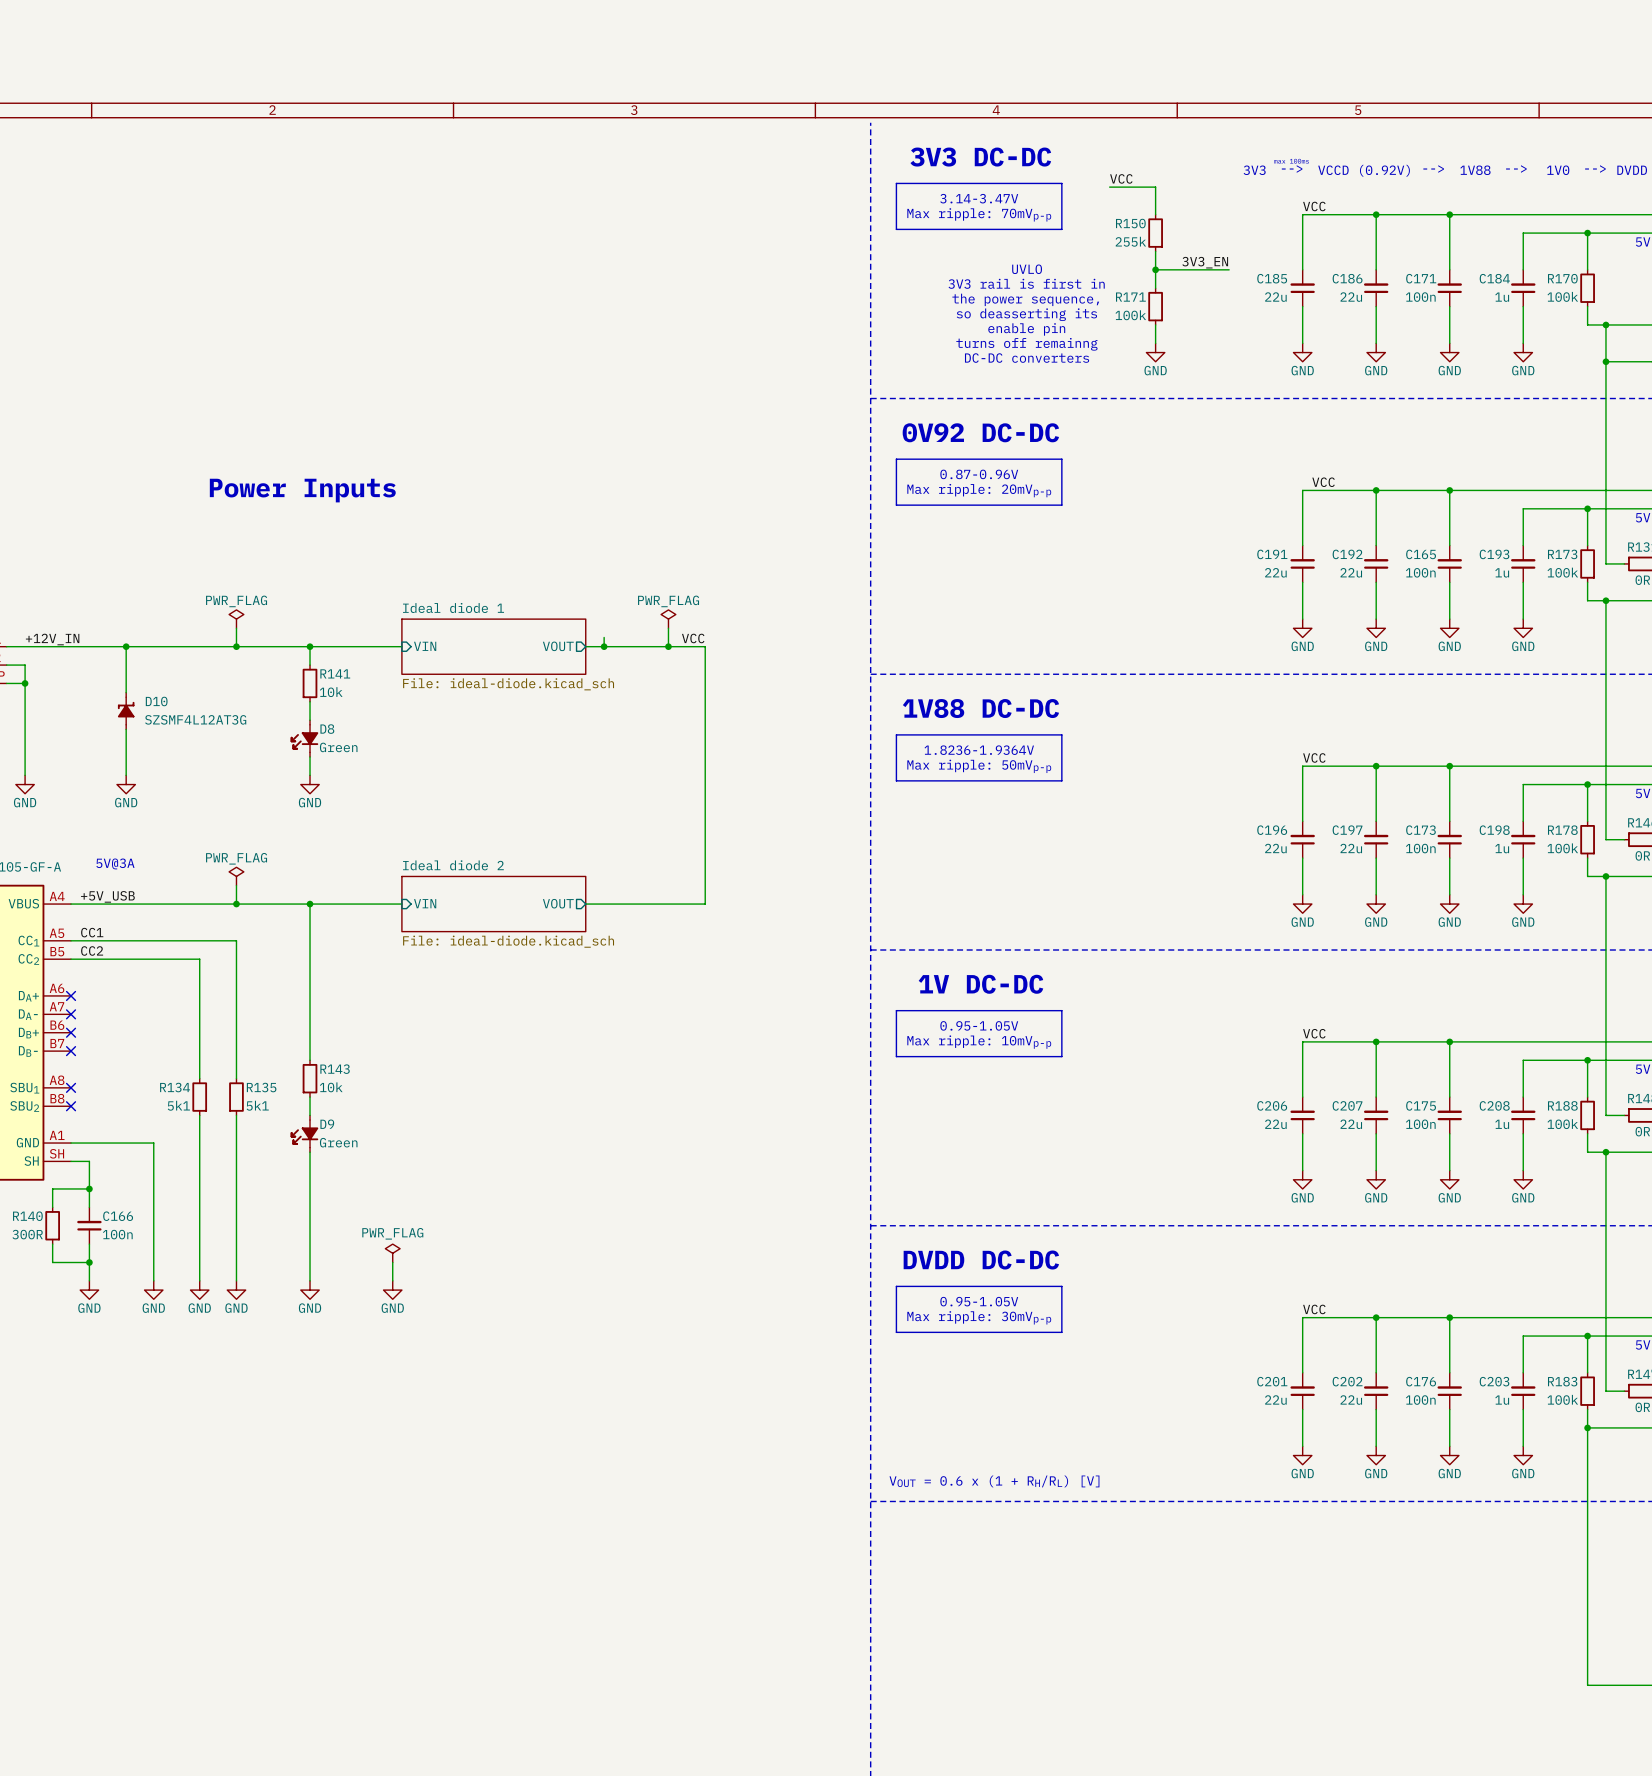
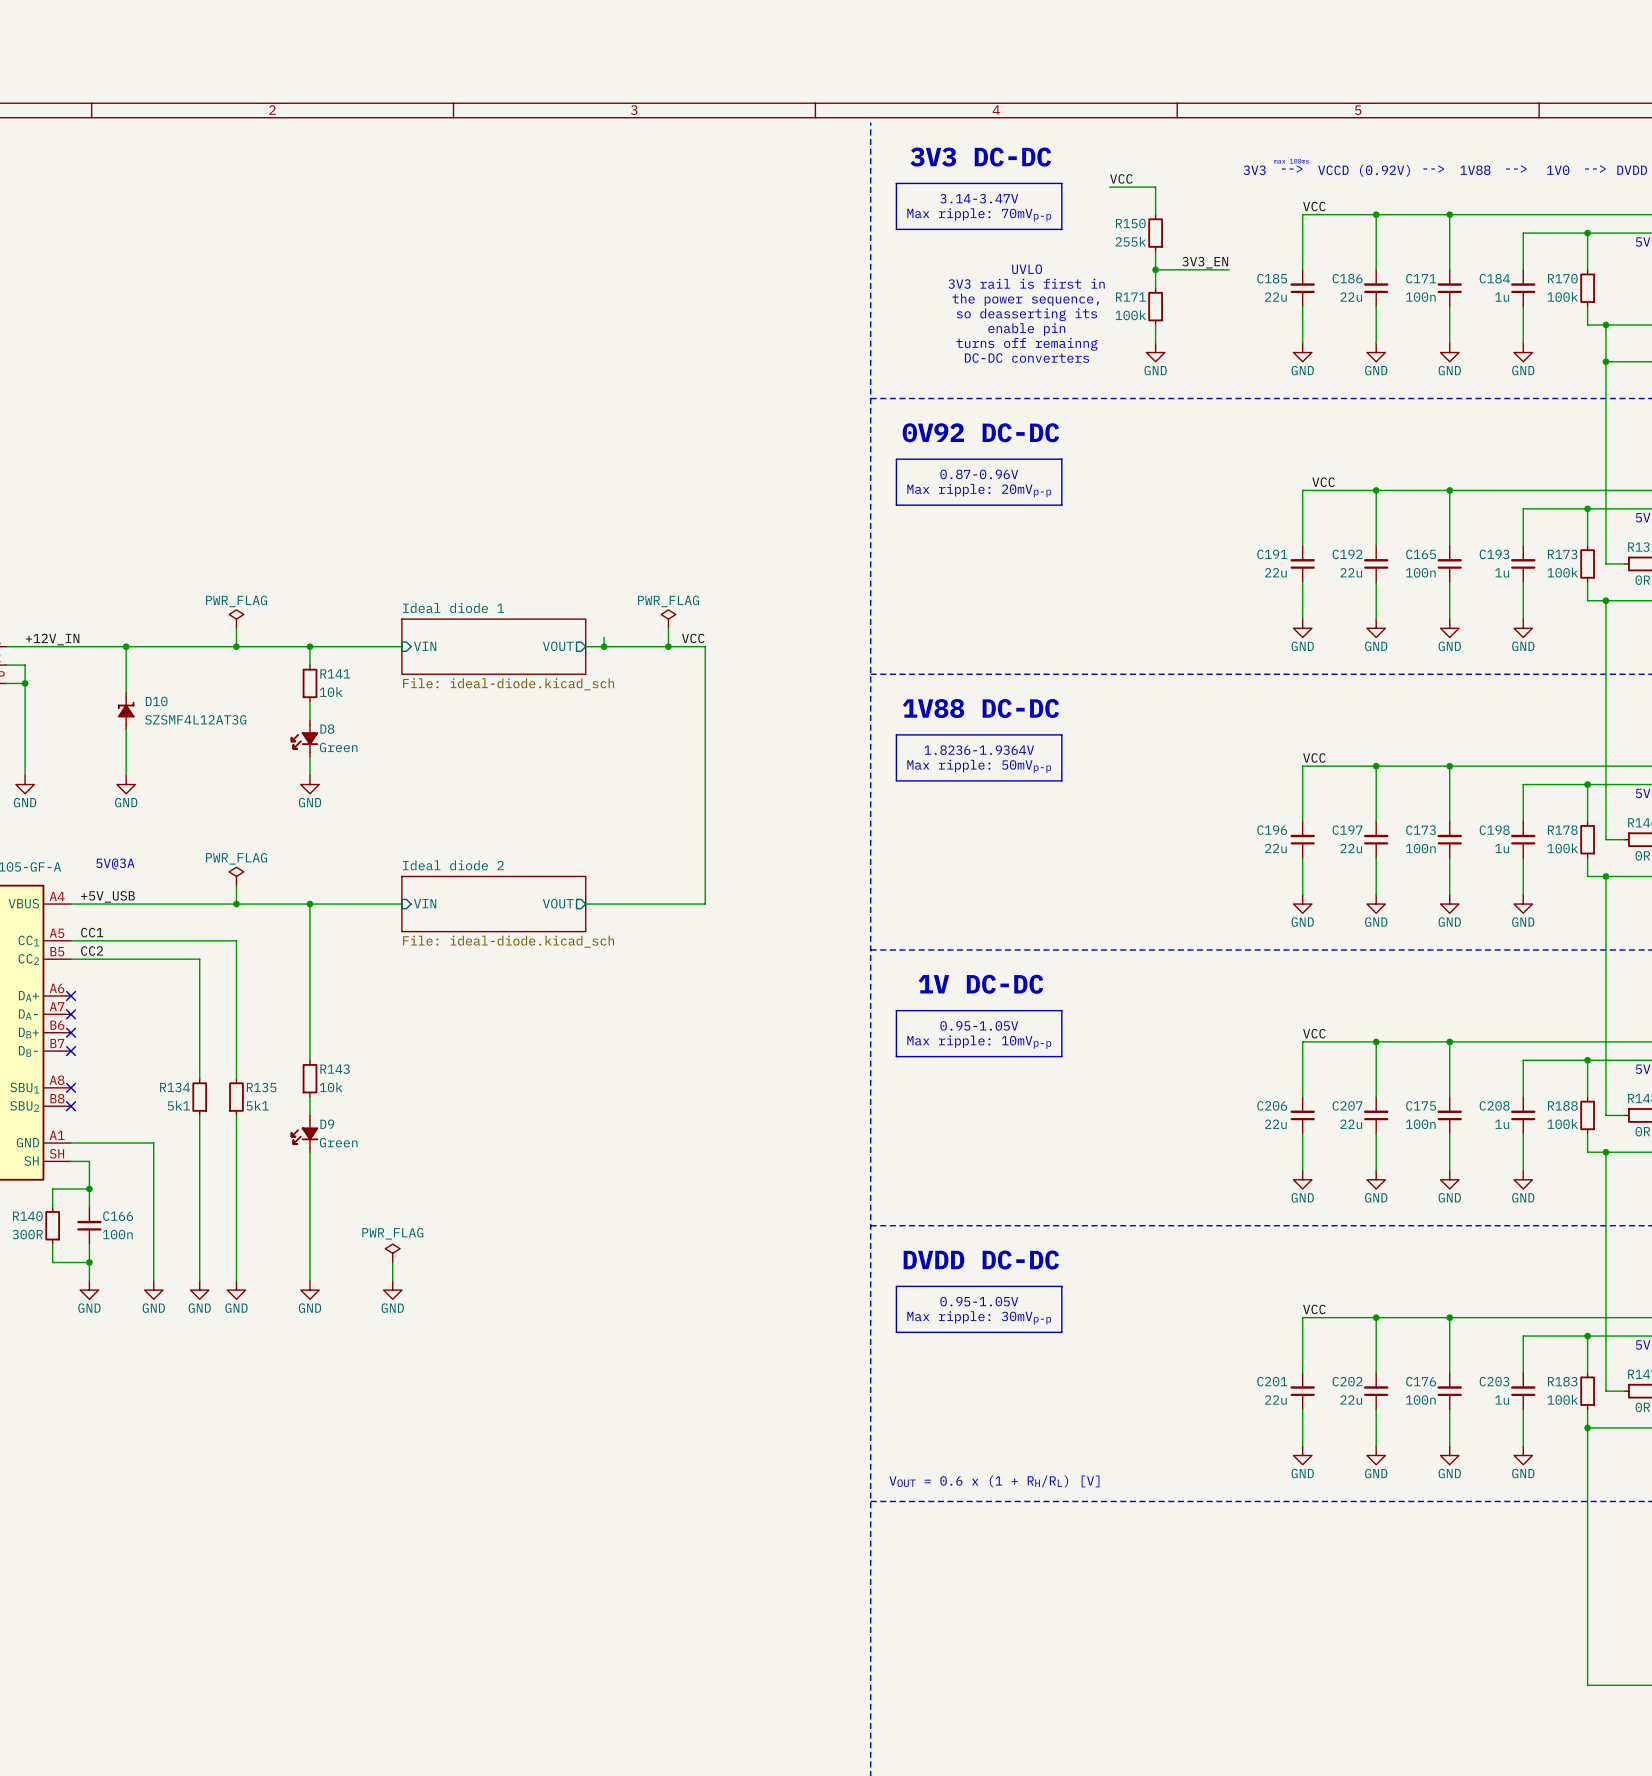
text: Power Inputs (302, 490) -> none

